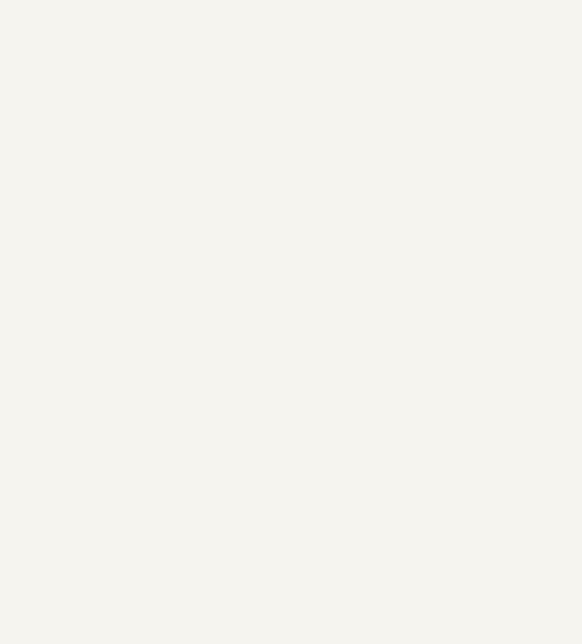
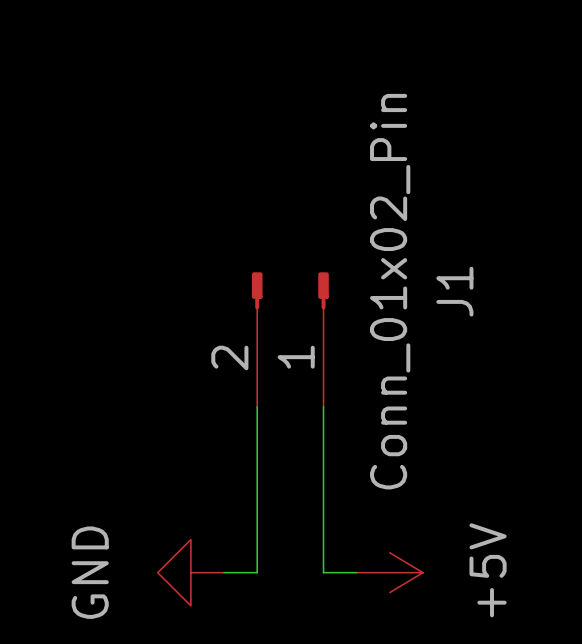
J1: none -> Conn_01x02_Pin (290, 339)
wire: none -> (257, 406) (257, 572) (224, 572)
wire: none -> (323, 406) (323, 572) (356, 572)
power symbol: none -> GND (190, 572)
power symbol: none -> +5V (389, 572)

